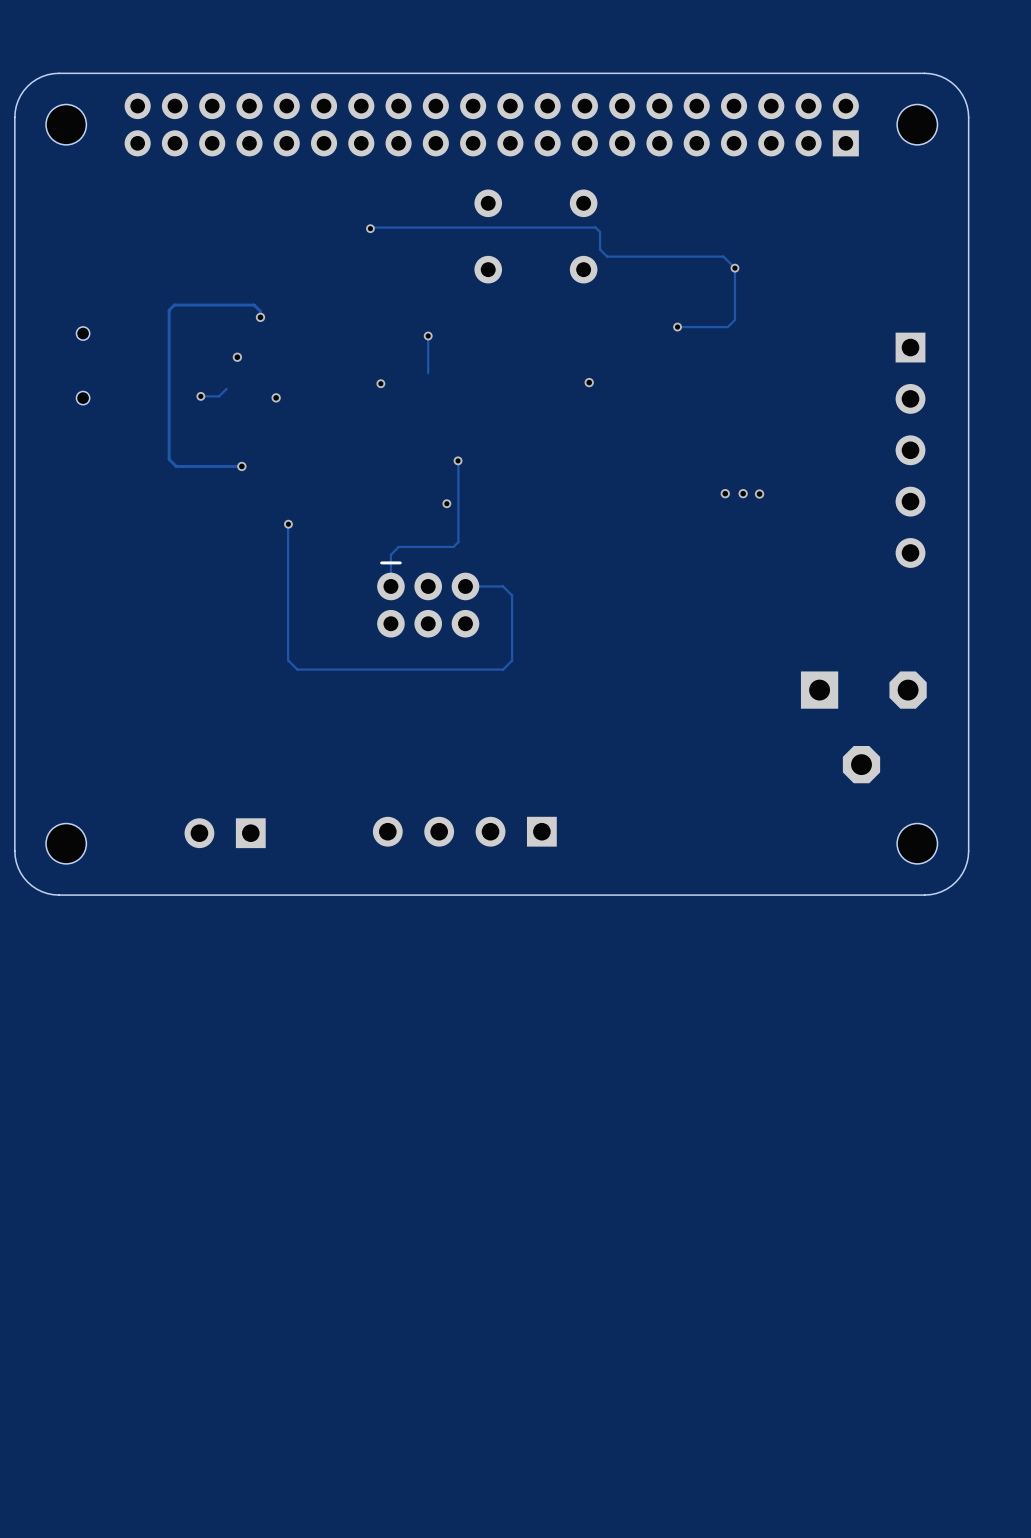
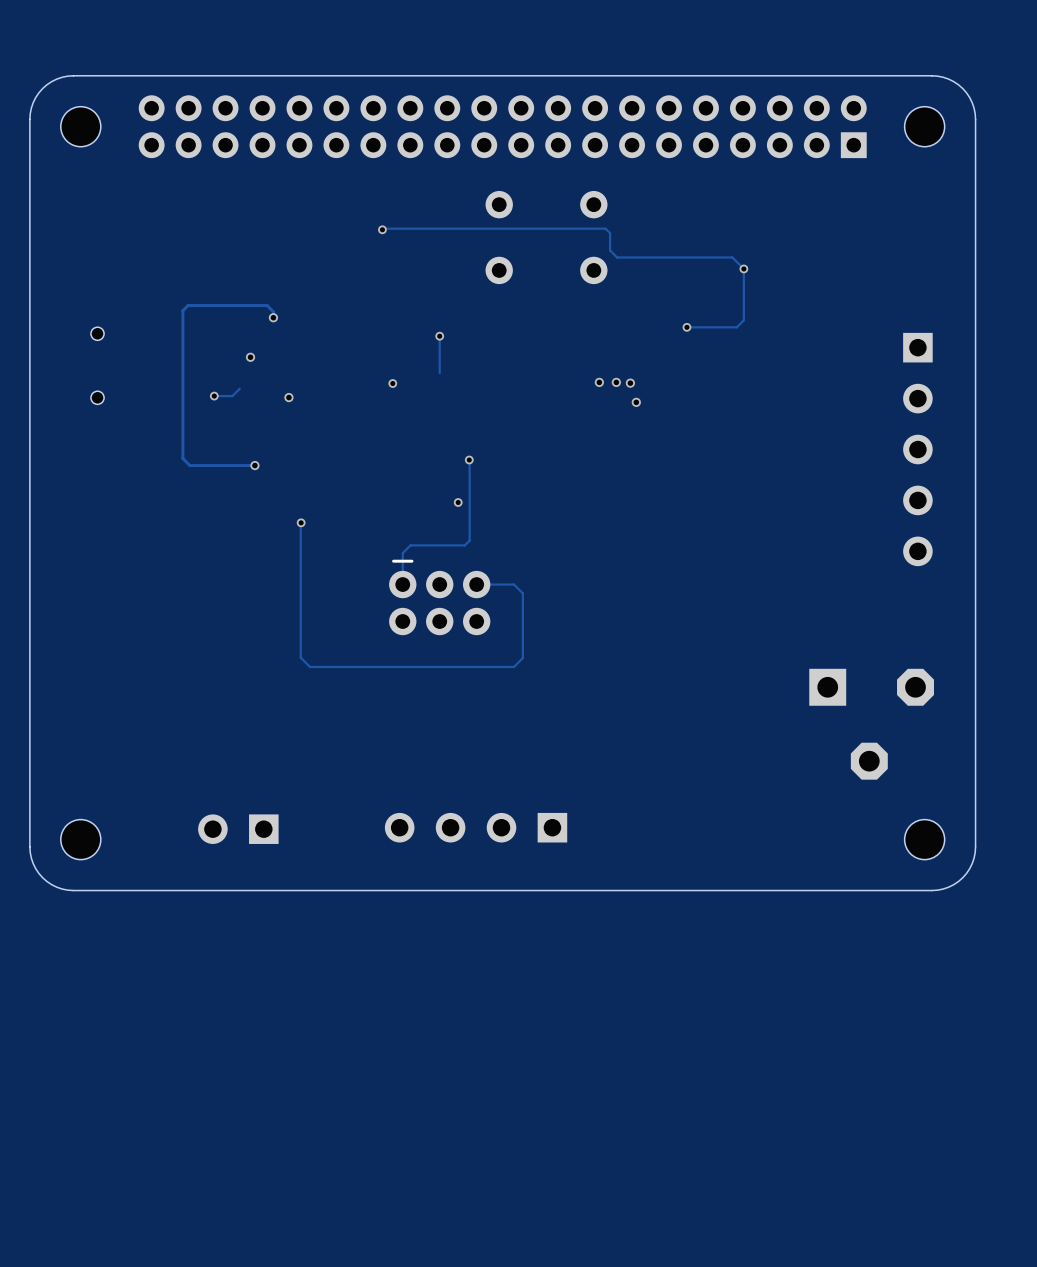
via: none -> (616, 382)
via: none -> (630, 383)
via: none -> (636, 402)
via: (725, 493) -> none
via: (743, 493) -> none
via: (759, 494) -> none

